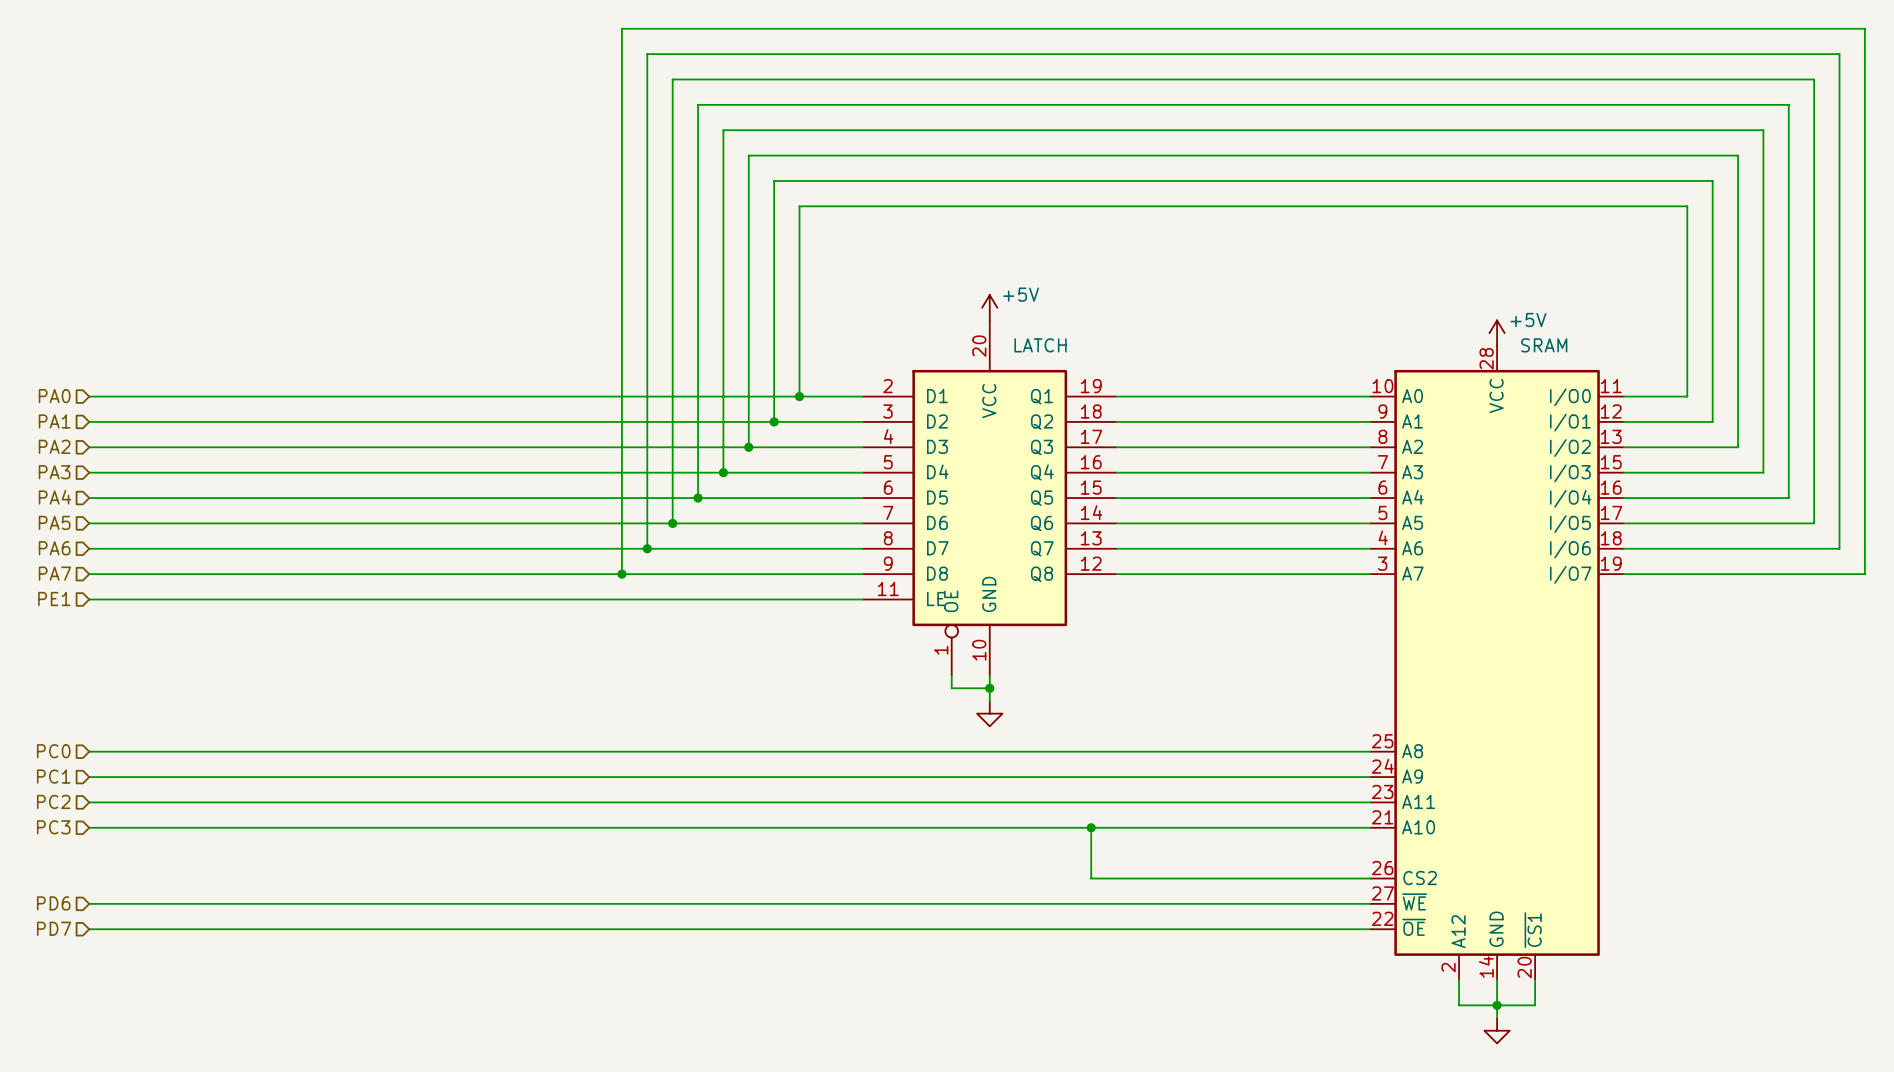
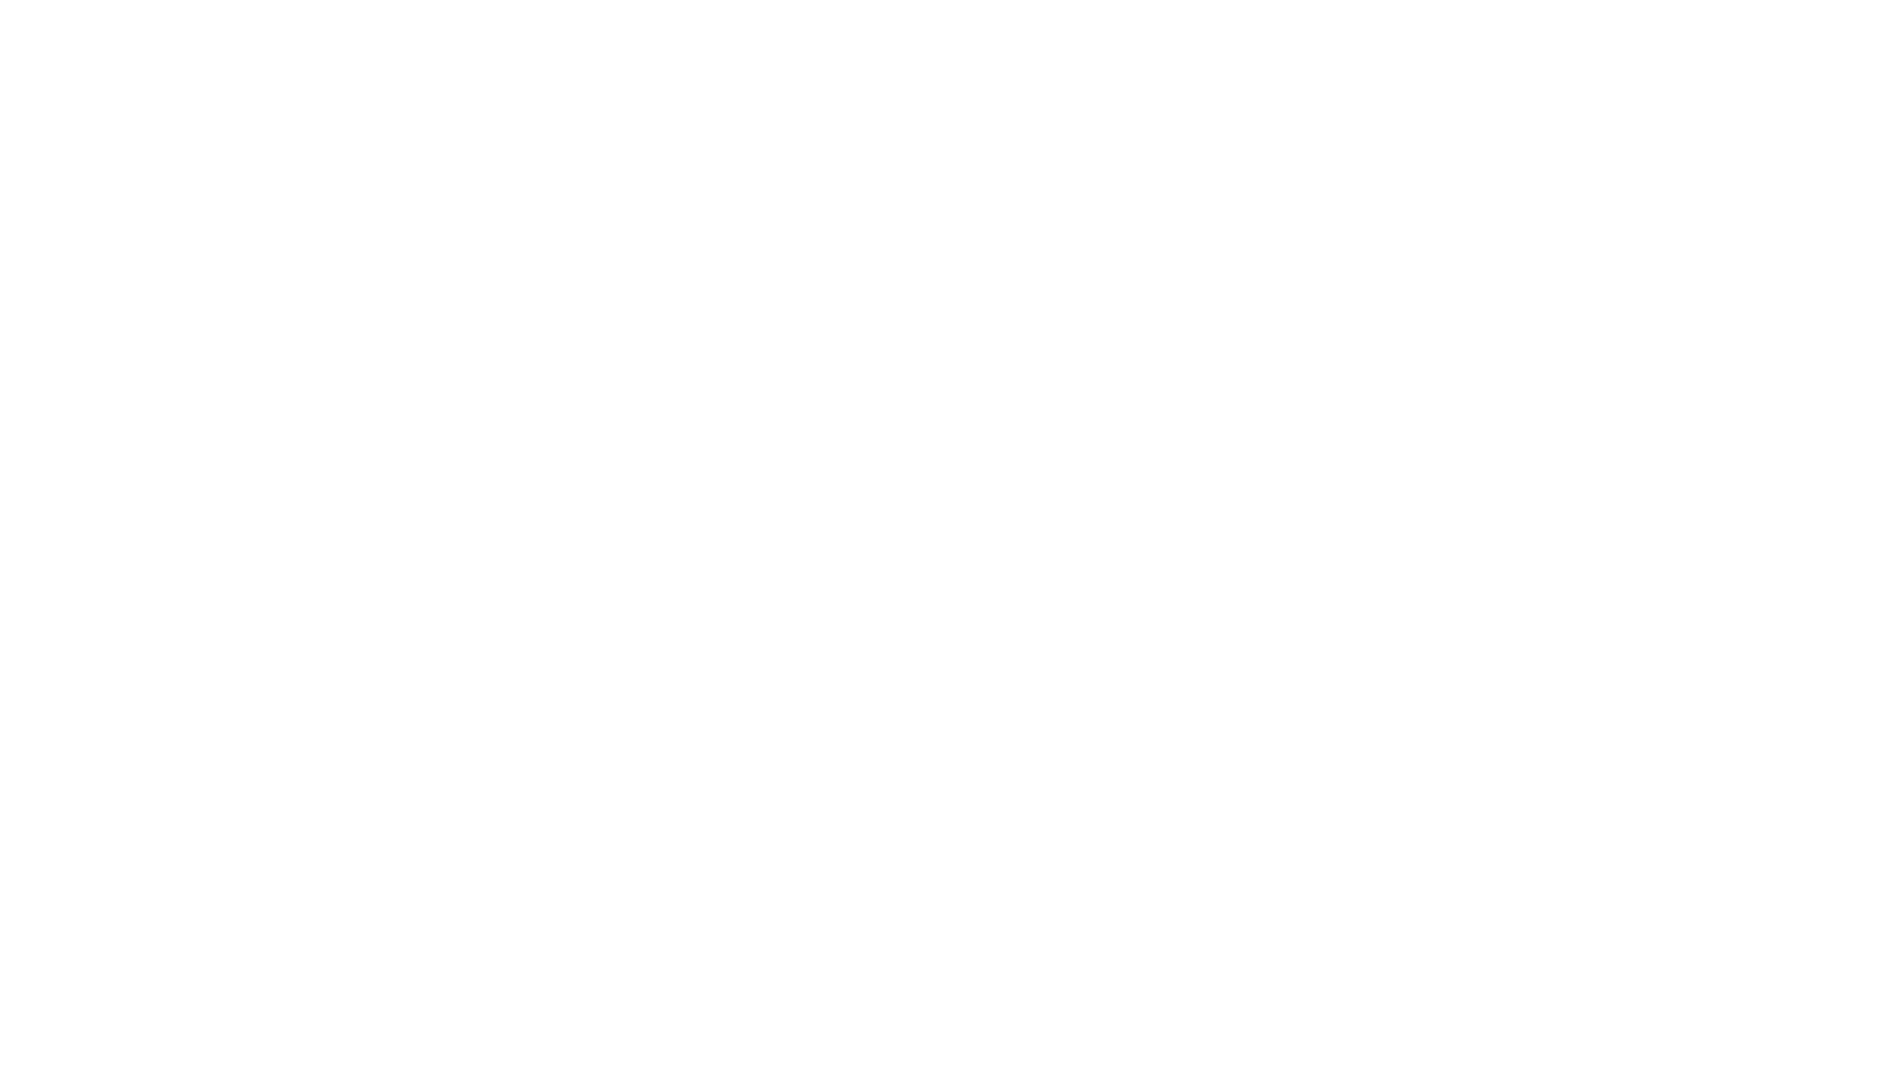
power symbol: +5V (989, 307) -> none
power symbol: +5V (1497, 333) -> none
hierarchical label: PA0 (54, 396) -> none
wire: (89, 396) (862, 396) -> none
wire: (799, 396) (799, 206) (1687, 206) (1687, 396) (1623, 396) -> none
junction: (799, 396) -> none
wire: (1116, 396) (1370, 396) -> none
hierarchical label: PA1 (54, 421) -> none
wire: (89, 421) (862, 421) -> none
wire: (774, 421) (774, 180) (1712, 180) (1712, 421) (1623, 421) -> none
junction: (774, 421) -> none
wire: (1116, 421) (1370, 421) -> none
hierarchical label: PA2 (54, 446) -> none
wire: (89, 447) (862, 447) -> none
wire: (748, 447) (748, 155) (1738, 155) (1738, 447) (1623, 447) -> none
junction: (748, 447) -> none
wire: (1116, 447) (1370, 447) -> none
hierarchical label: PA3 (54, 472) -> none
wire: (89, 472) (862, 472) -> none
wire: (723, 472) (723, 130) (1763, 130) (1763, 472) (1623, 472) -> none
junction: (723, 472) -> none
wire: (1116, 472) (1370, 472) -> none
hierarchical label: PA4 (54, 497) -> none
wire: (89, 498) (862, 498) -> none
wire: (698, 498) (698, 104) (1788, 104) (1788, 498) (1623, 498) -> none
junction: (698, 498) -> none
part: LATCH (989, 498) -> none
wire: (1116, 498) (1370, 498) -> none
hierarchical label: PA5 (54, 522) -> none
wire: (89, 523) (862, 523) -> none
wire: (672, 523) (672, 79) (1814, 79) (1814, 523) (1623, 523) -> none
junction: (672, 523) -> none
wire: (1116, 523) (1370, 523) -> none
hierarchical label: PA6 (54, 548) -> none
wire: (89, 548) (862, 548) -> none
wire: (647, 548) (647, 54) (1839, 54) (1839, 548) (1623, 548) -> none
junction: (647, 548) -> none
wire: (1116, 548) (1370, 548) -> none
hierarchical label: PA7 (54, 573) -> none
wire: (89, 574) (862, 574) -> none
wire: (621, 574) (621, 28) (1864, 28) (1864, 574) (1623, 574) -> none
junction: (621, 574) -> none
wire: (1116, 574) (1370, 574) -> none
hierarchical label: PE1 (54, 599) -> none
wire: (89, 599) (862, 599) -> none
part: SRAM (1497, 662) -> none
wire: (951, 675) (951, 688) (989, 688) -> none
wire: (989, 675) (989, 700) -> none
junction: (989, 688) -> none
power symbol: (989, 713) -> none
hierarchical label: PC0 (53, 751) -> none
wire: (89, 751) (1370, 751) -> none
hierarchical label: PC1 (53, 776) -> none
wire: (89, 777) (1370, 777) -> none
hierarchical label: PC2 (53, 801) -> none
wire: (89, 802) (1370, 802) -> none
hierarchical label: PC3 (53, 827) -> none
wire: (89, 827) (1370, 827) -> none
wire: (1091, 827) (1091, 878) (1370, 878) -> none
junction: (1091, 827) -> none
hierarchical label: PD6 (53, 903) -> none
wire: (89, 903) (1370, 903) -> none
hierarchical label: PD7 (54, 928) -> none
wire: (89, 929) (1370, 929) -> none
wire: (1459, 979) (1459, 1005) (1535, 1005) (1535, 979) -> none
wire: (1497, 979) (1497, 1018) -> none
junction: (1497, 1005) -> none
power symbol: (1497, 1030) -> none

